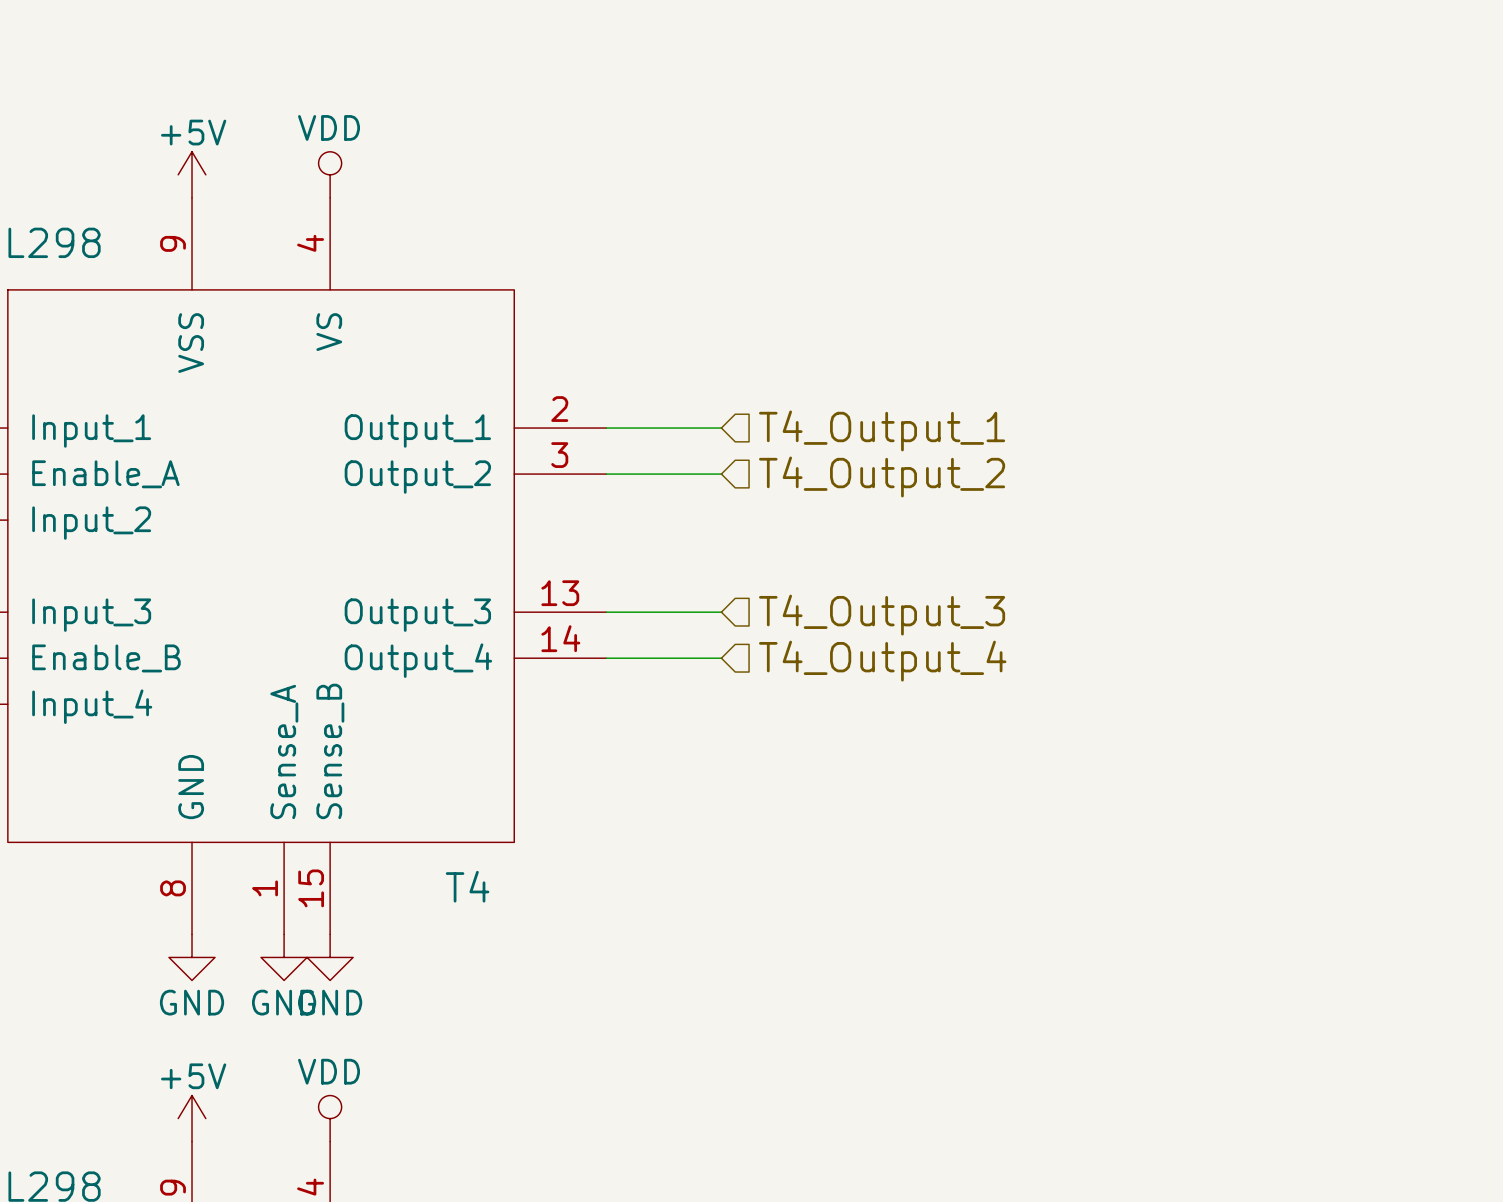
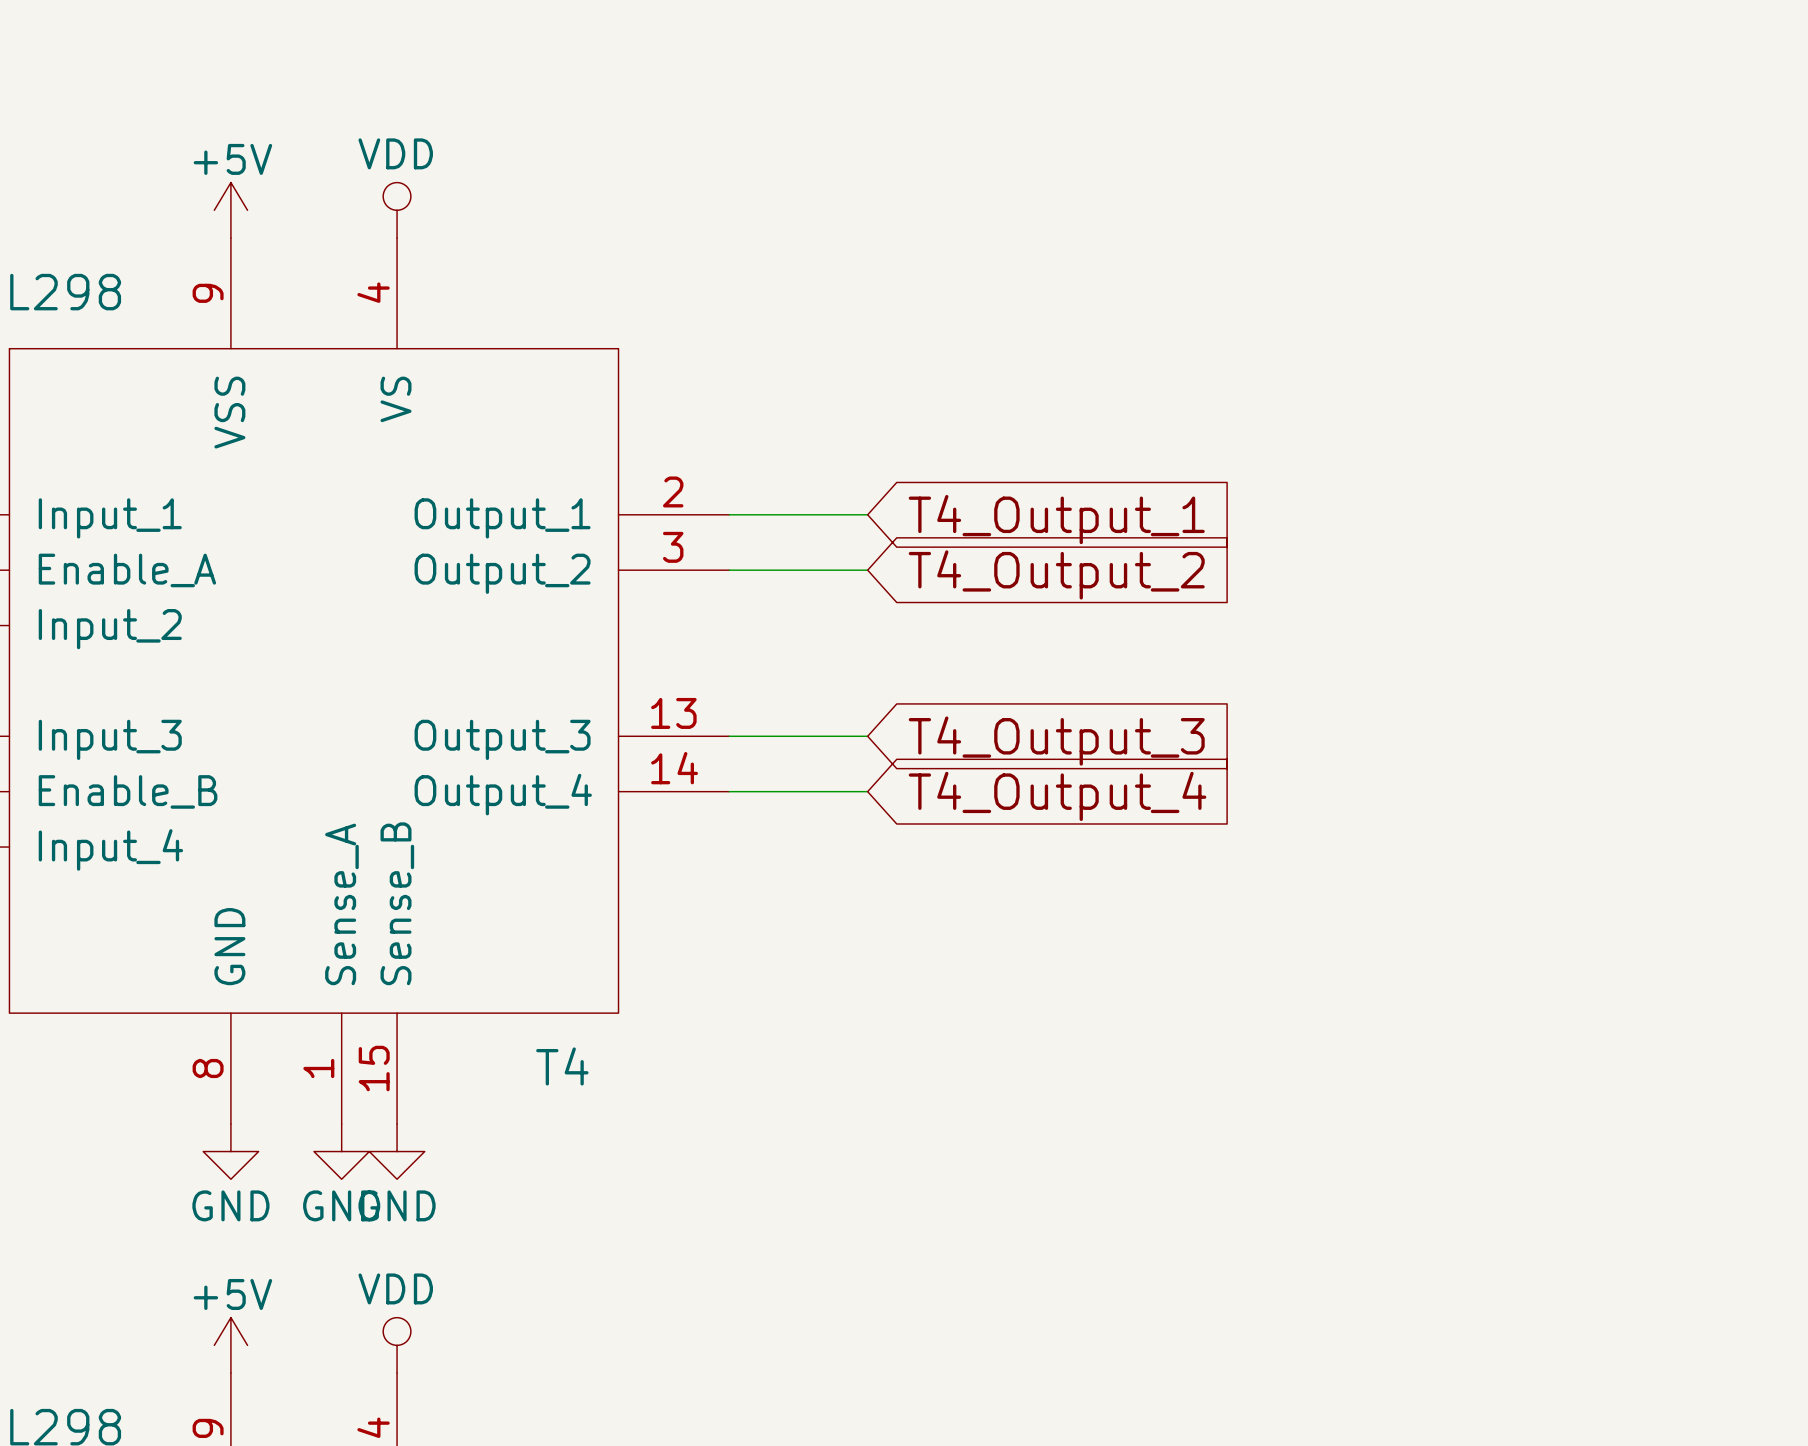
hierarchical label: T4_Output_1 (882, 430) -> none
global label: none -> T4_Output_1 (1056, 519)
hierarchical label: T4_Output_2 (882, 476) -> none
global label: none -> T4_Output_2 (1056, 574)
hierarchical label: T4_Output_3 (882, 615) -> none
global label: none -> T4_Output_3 (1056, 741)
hierarchical label: T4_Output_4 (882, 661) -> none
global label: none -> T4_Output_4 (1057, 796)

